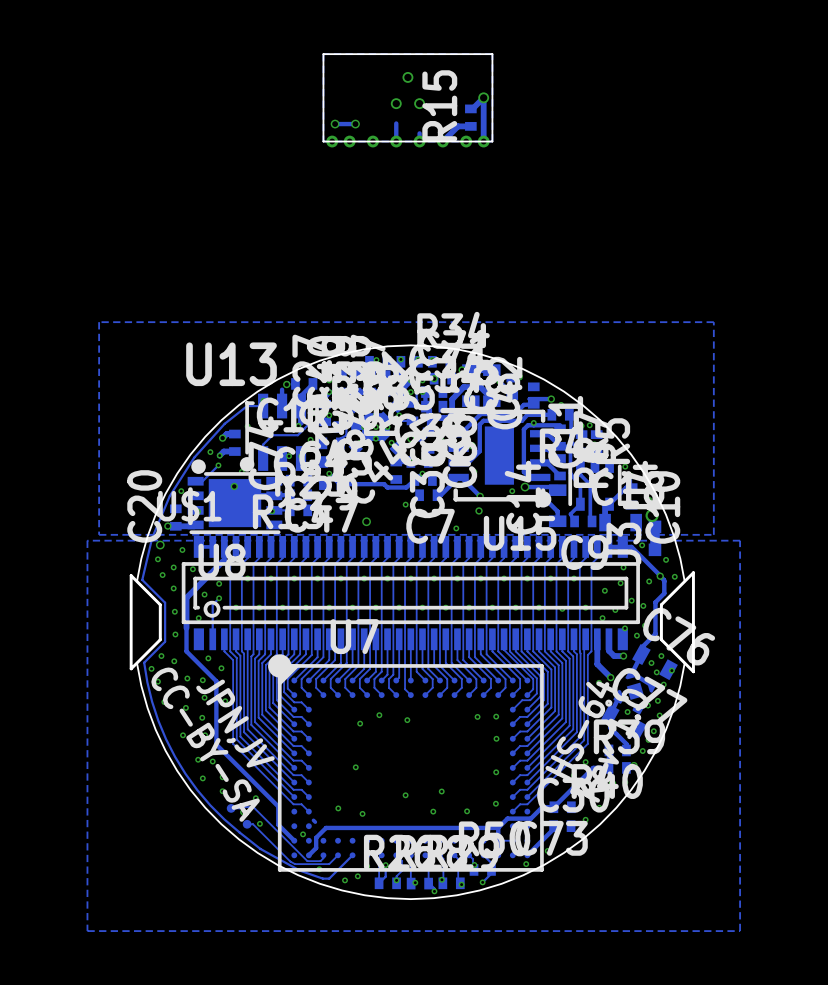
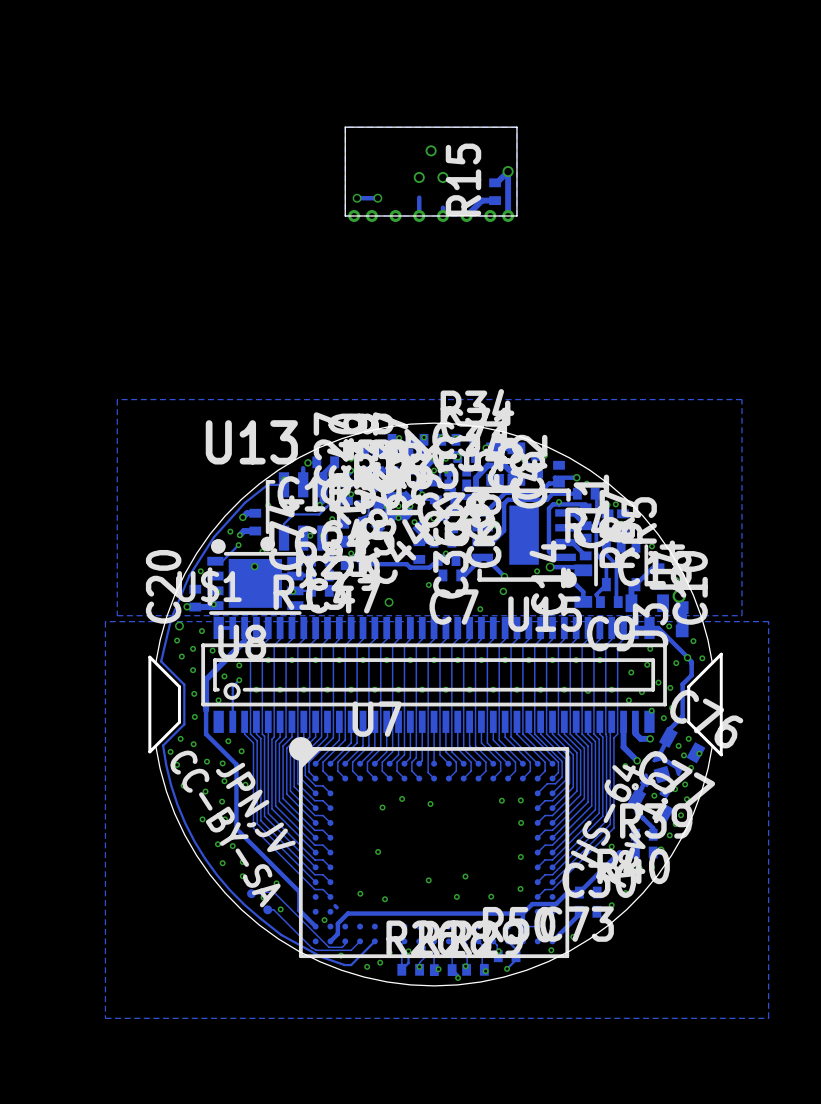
via: none -> (213, 604)

